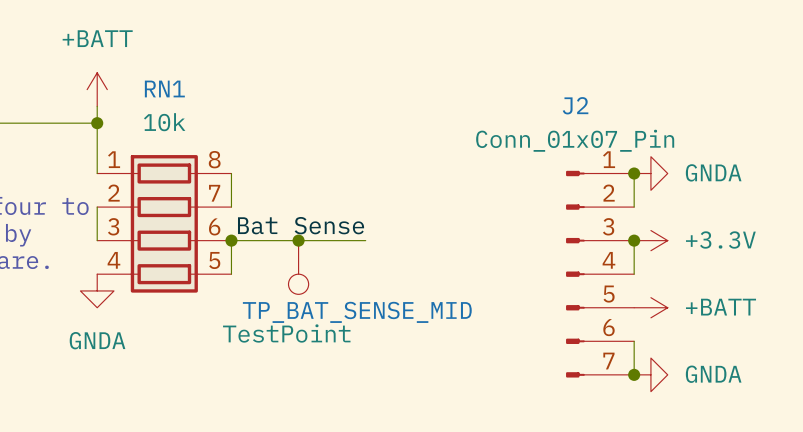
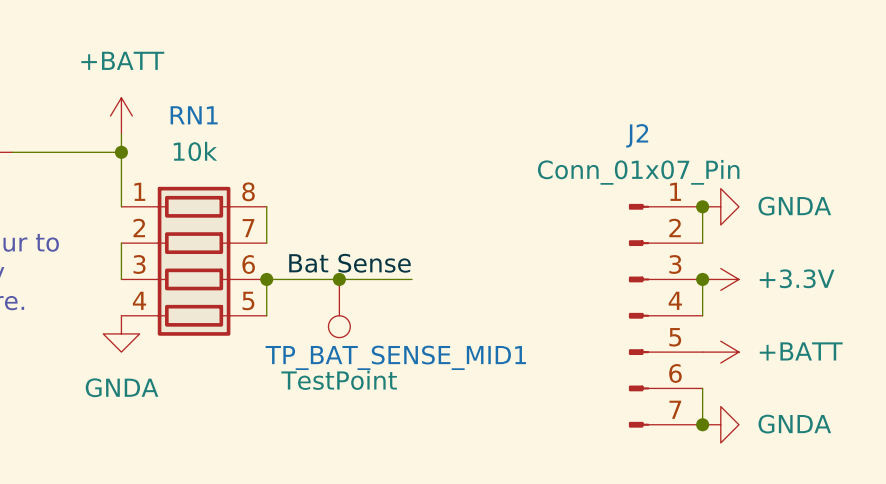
TP_BAT_SENSE_MID name: TP_BAT_SENSE_MID (357, 312) -> TP_BAT_SENSE_MID1 (395, 357)

